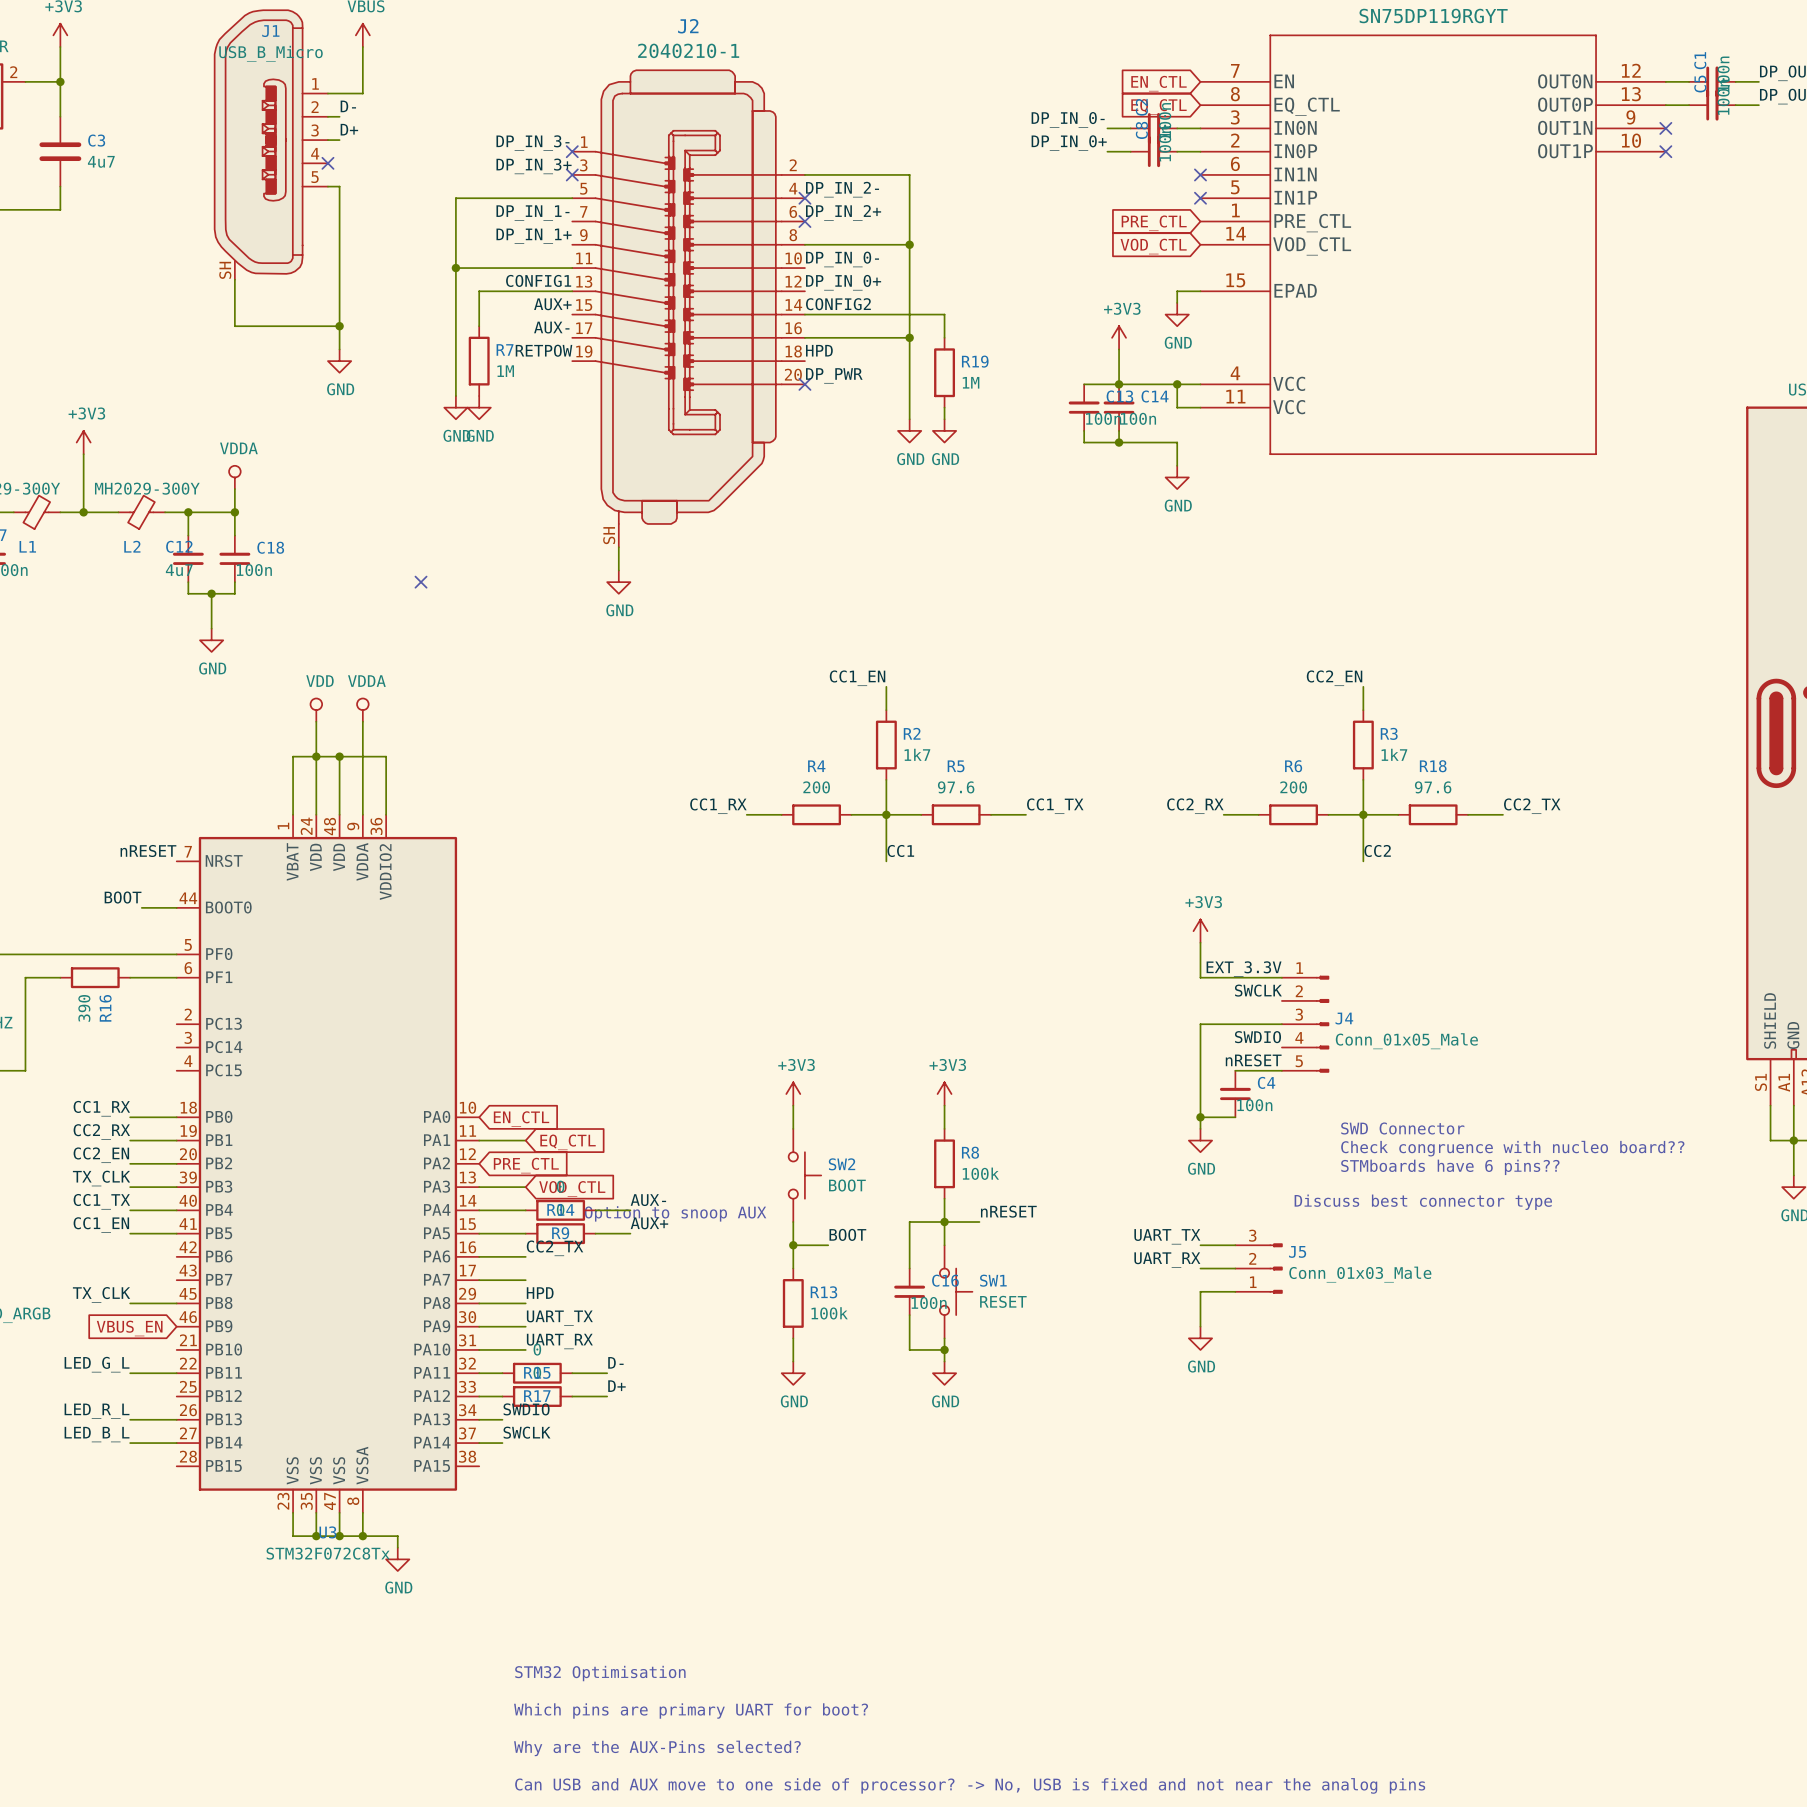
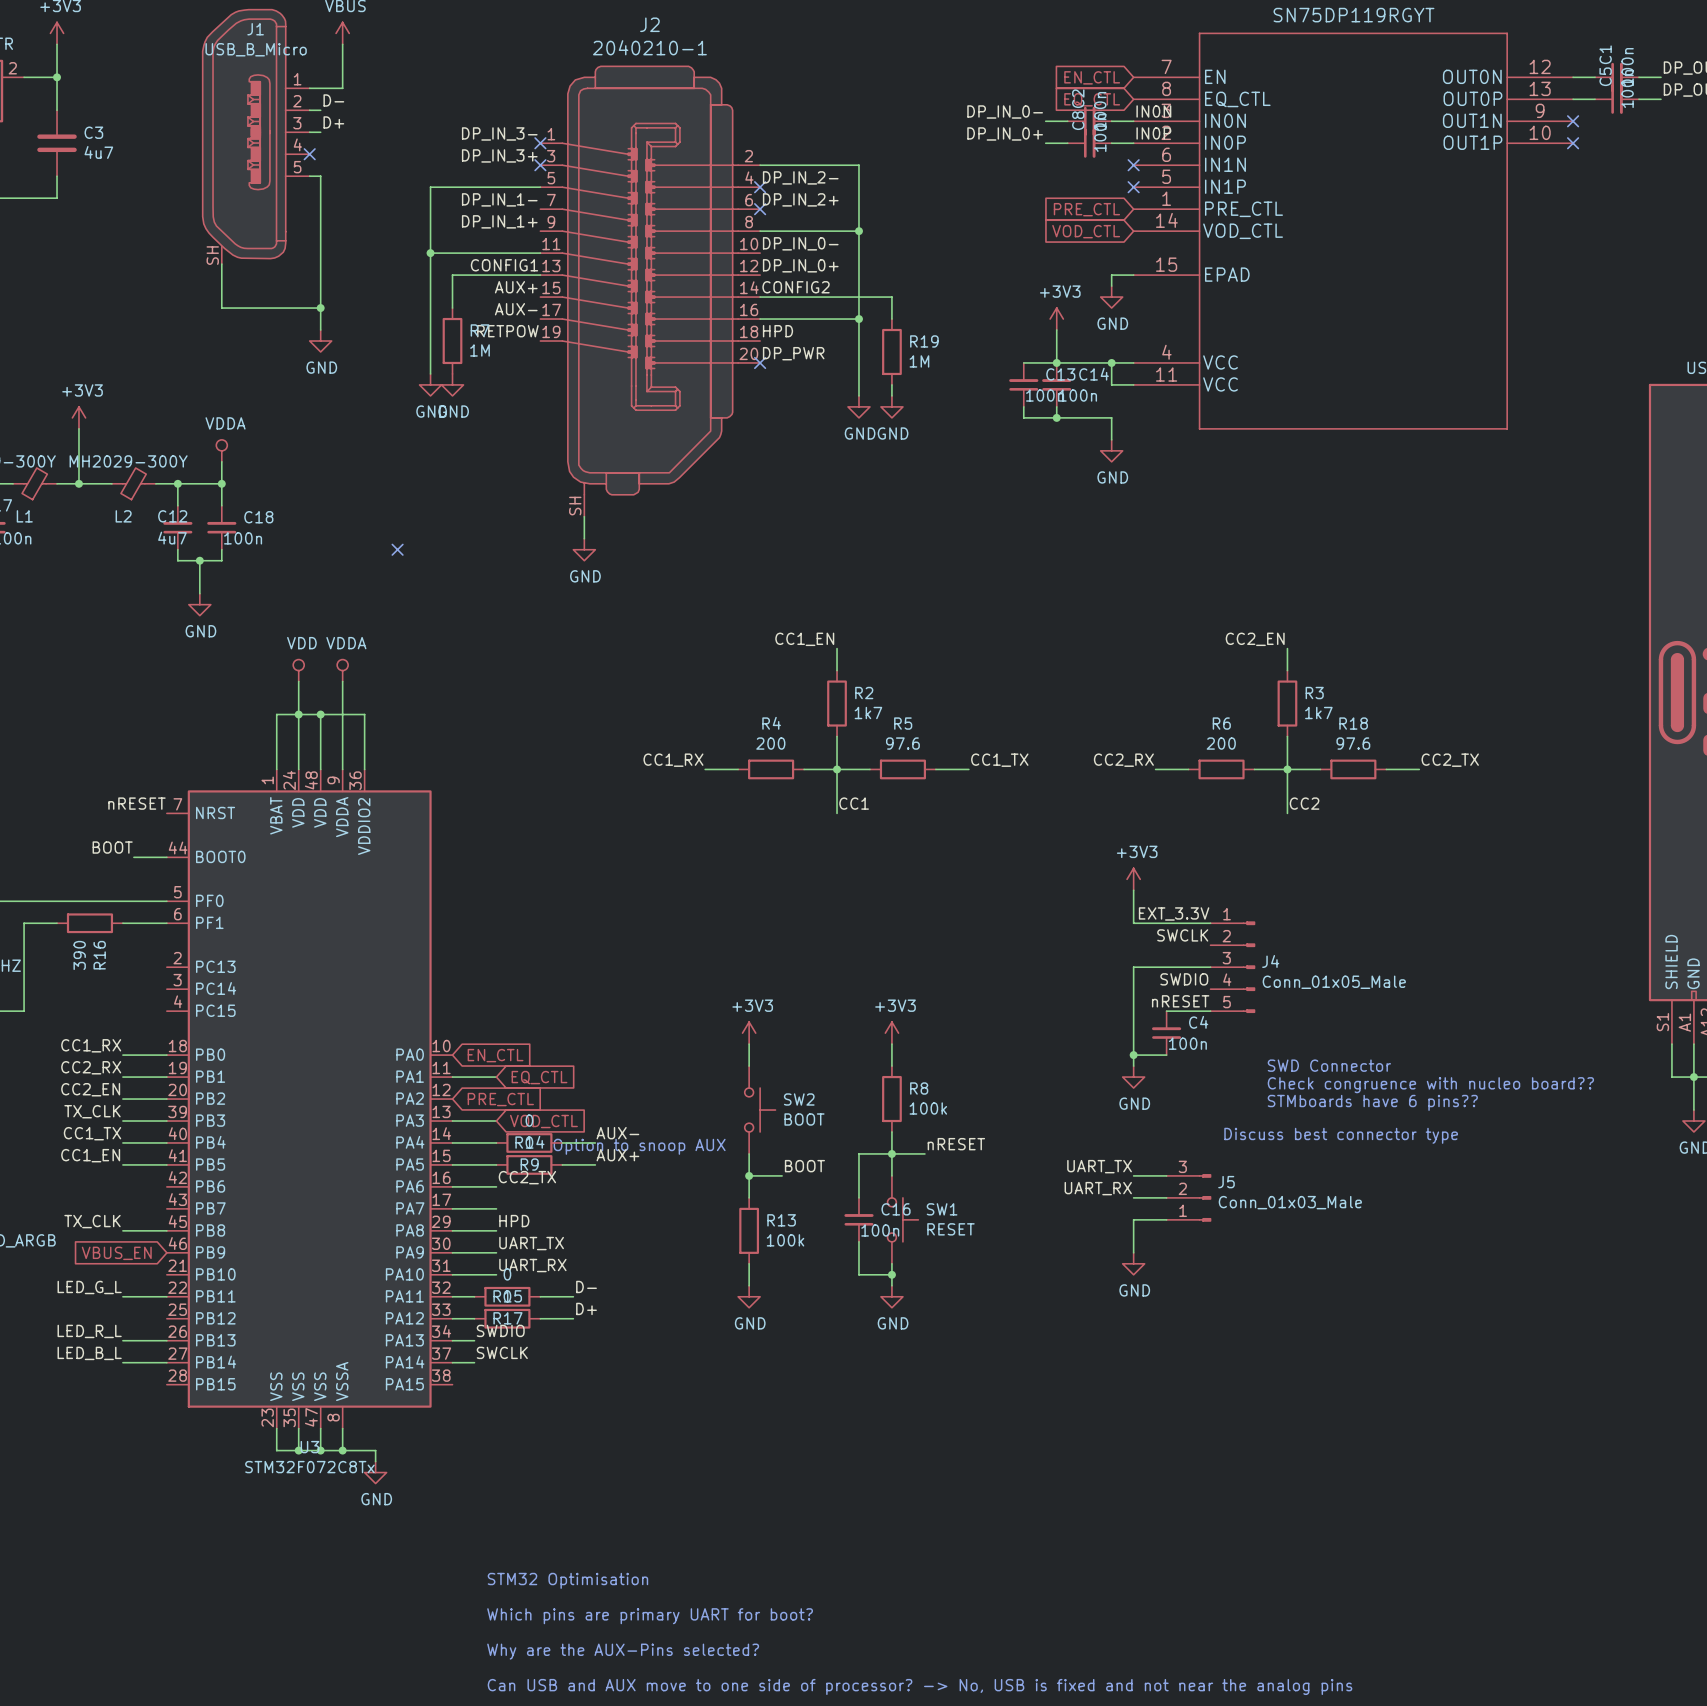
label: none -> IN0N (1153, 111)
label: none -> IN0P (1153, 133)

